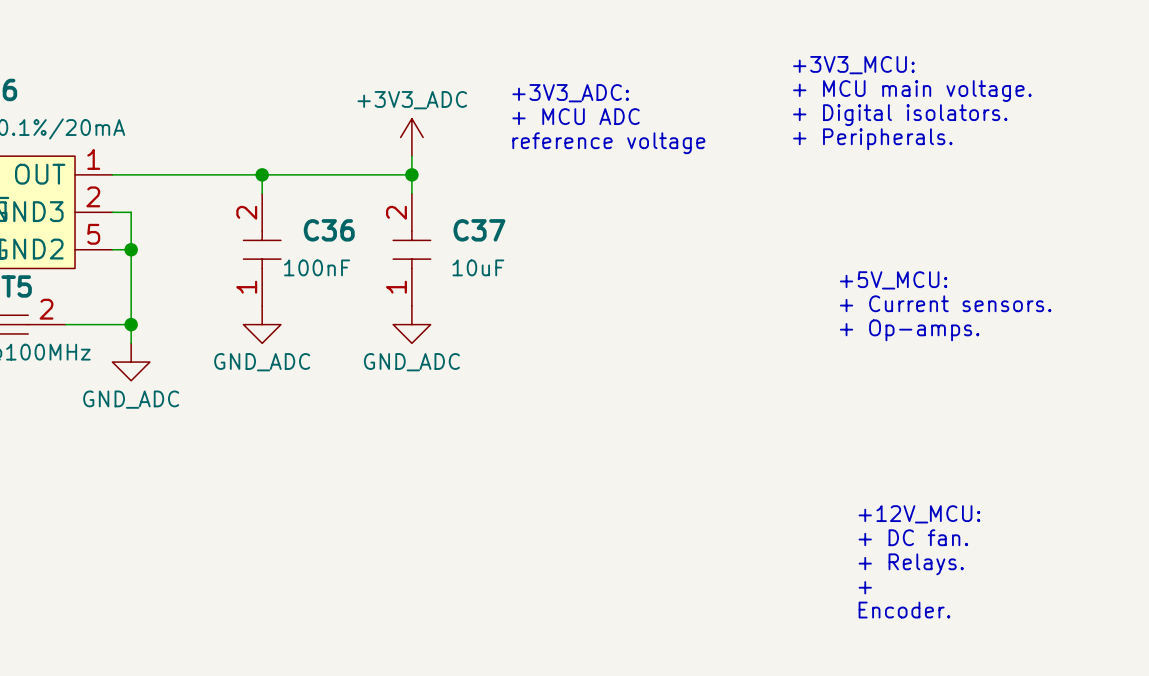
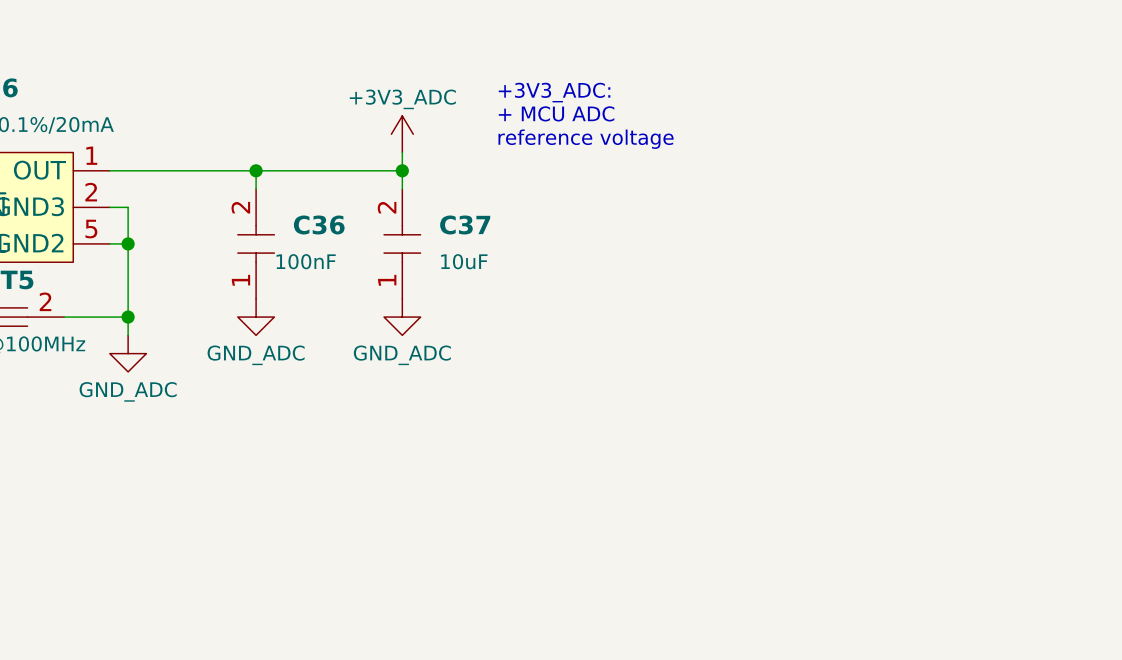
text: +3V3_MCU: (853, 65) -> none
text: + MCU main voltage. (912, 91) -> none
text: + Digital isolators. (900, 115) -> none
text: + Peripherals. (872, 139) -> none
text: +5V_MCU: (893, 280) -> none
text: + Current sensors. (945, 303) -> none
text: + Op-amps. (909, 330) -> none
text: +12V_MCU: (919, 514) -> none
text: + DC fan. (913, 537) -> none
text: + Relays. (911, 564) -> none
text: + (865, 587) -> none
text: Encoder. (904, 610) -> none

